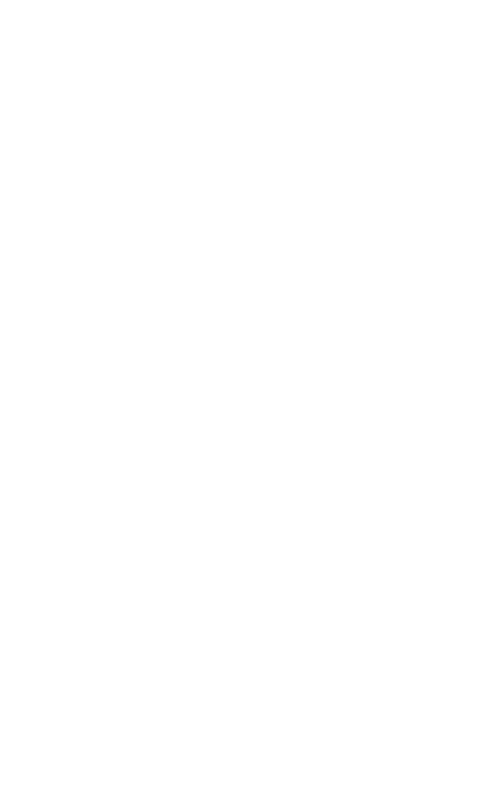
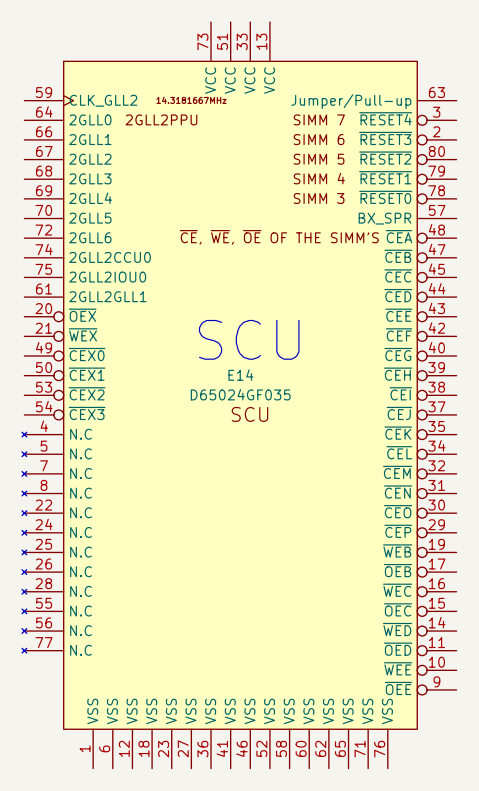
text: none -> SCU (249, 339)
E14: none -> D65024GF035 (239, 395)

